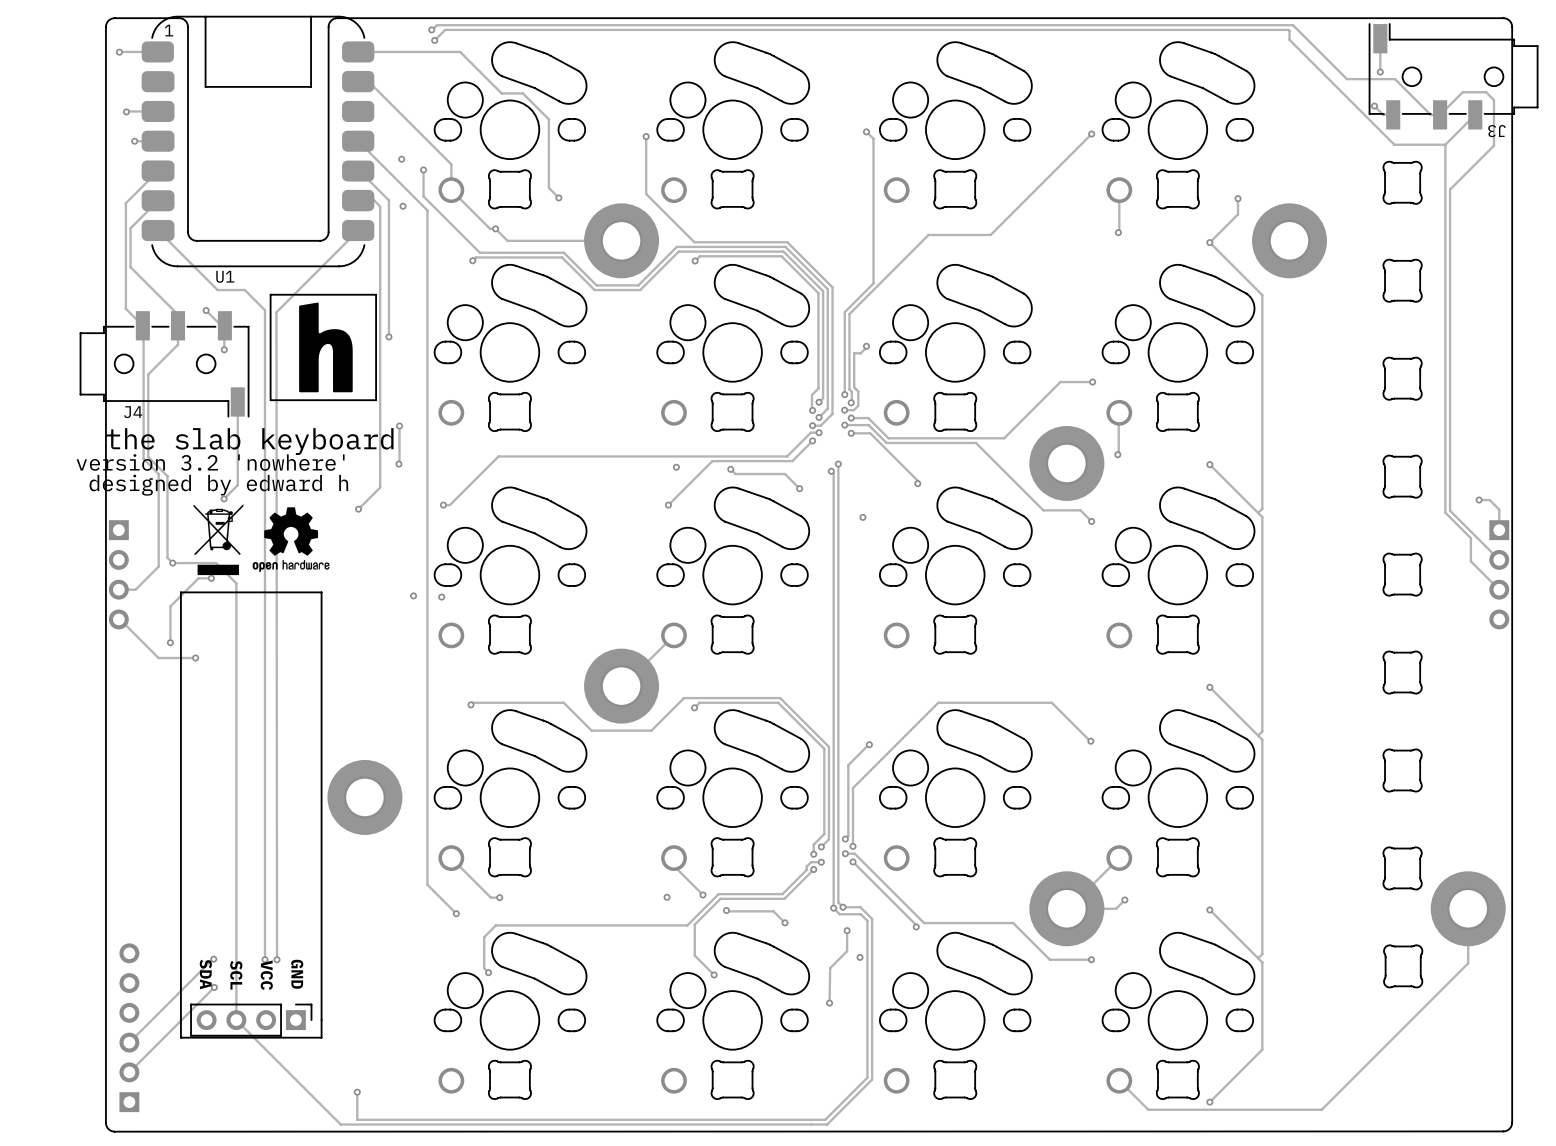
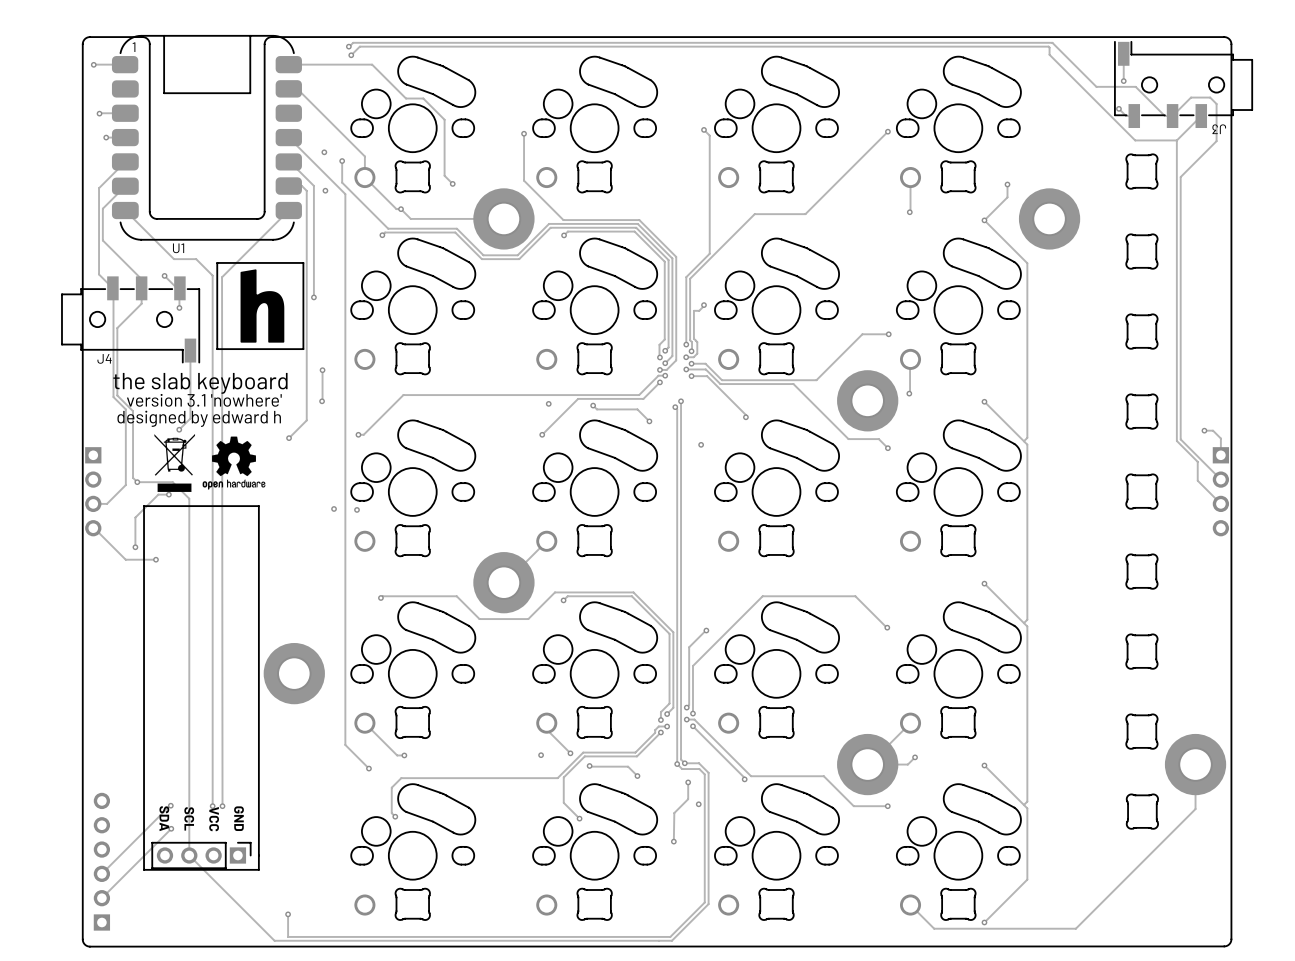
text: version 3.2 'nowhere' (210, 462) -> version 3.1 'nowhere' (204, 400)

